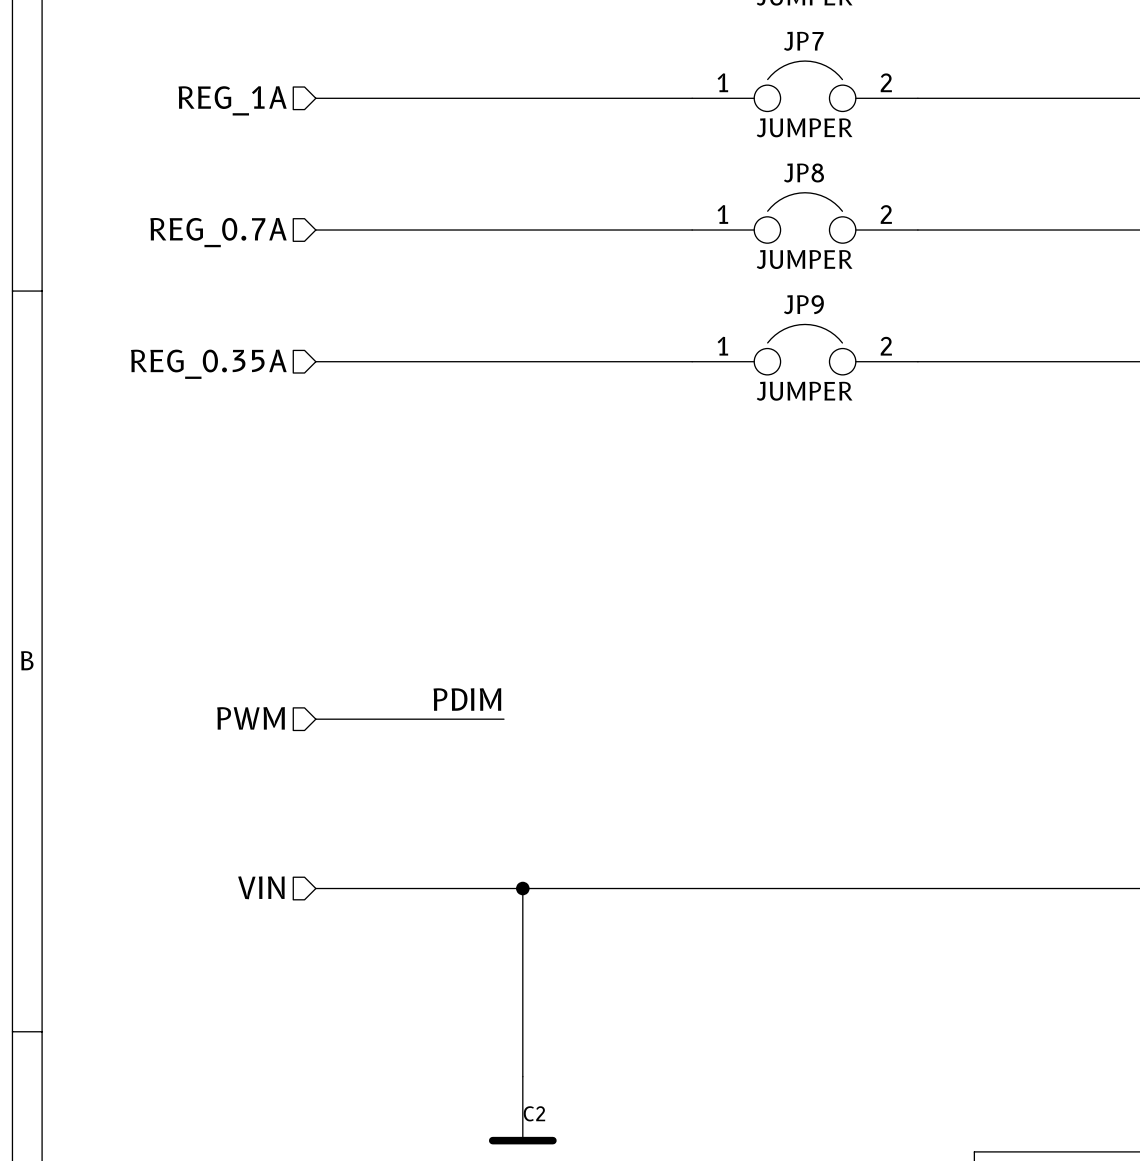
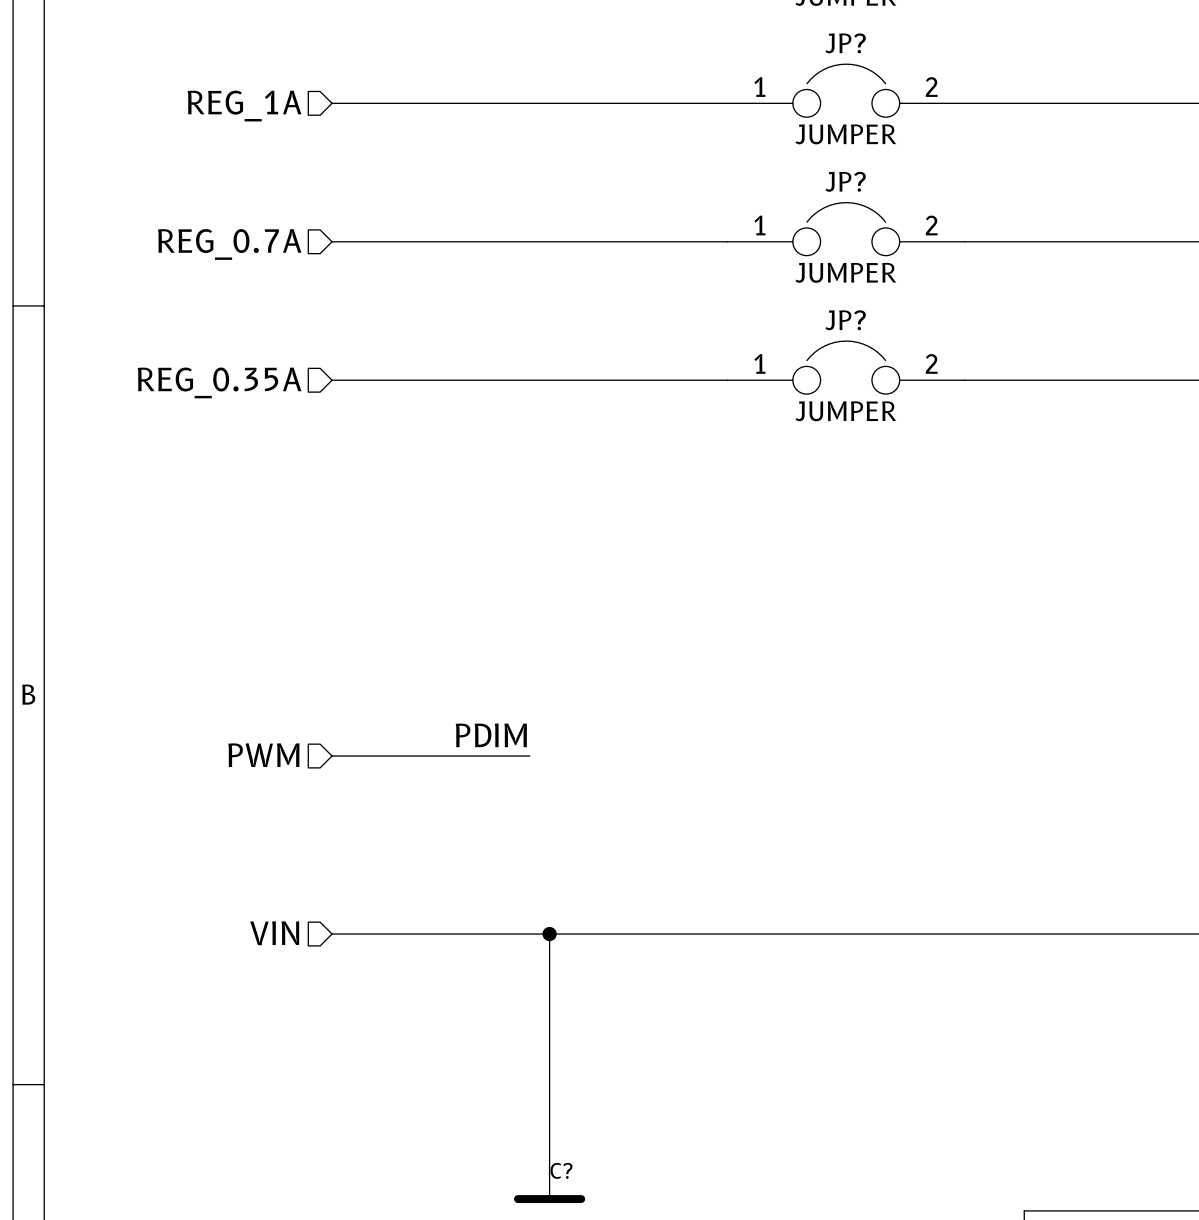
JP7 name: JP7 (803, 41) -> JP? (845, 43)
JP8 name: JP8 (803, 172) -> JP? (845, 181)
JP9 name: JP9 (803, 304) -> JP? (845, 320)
C2 name: C2 (534, 1113) -> C? (561, 1170)

